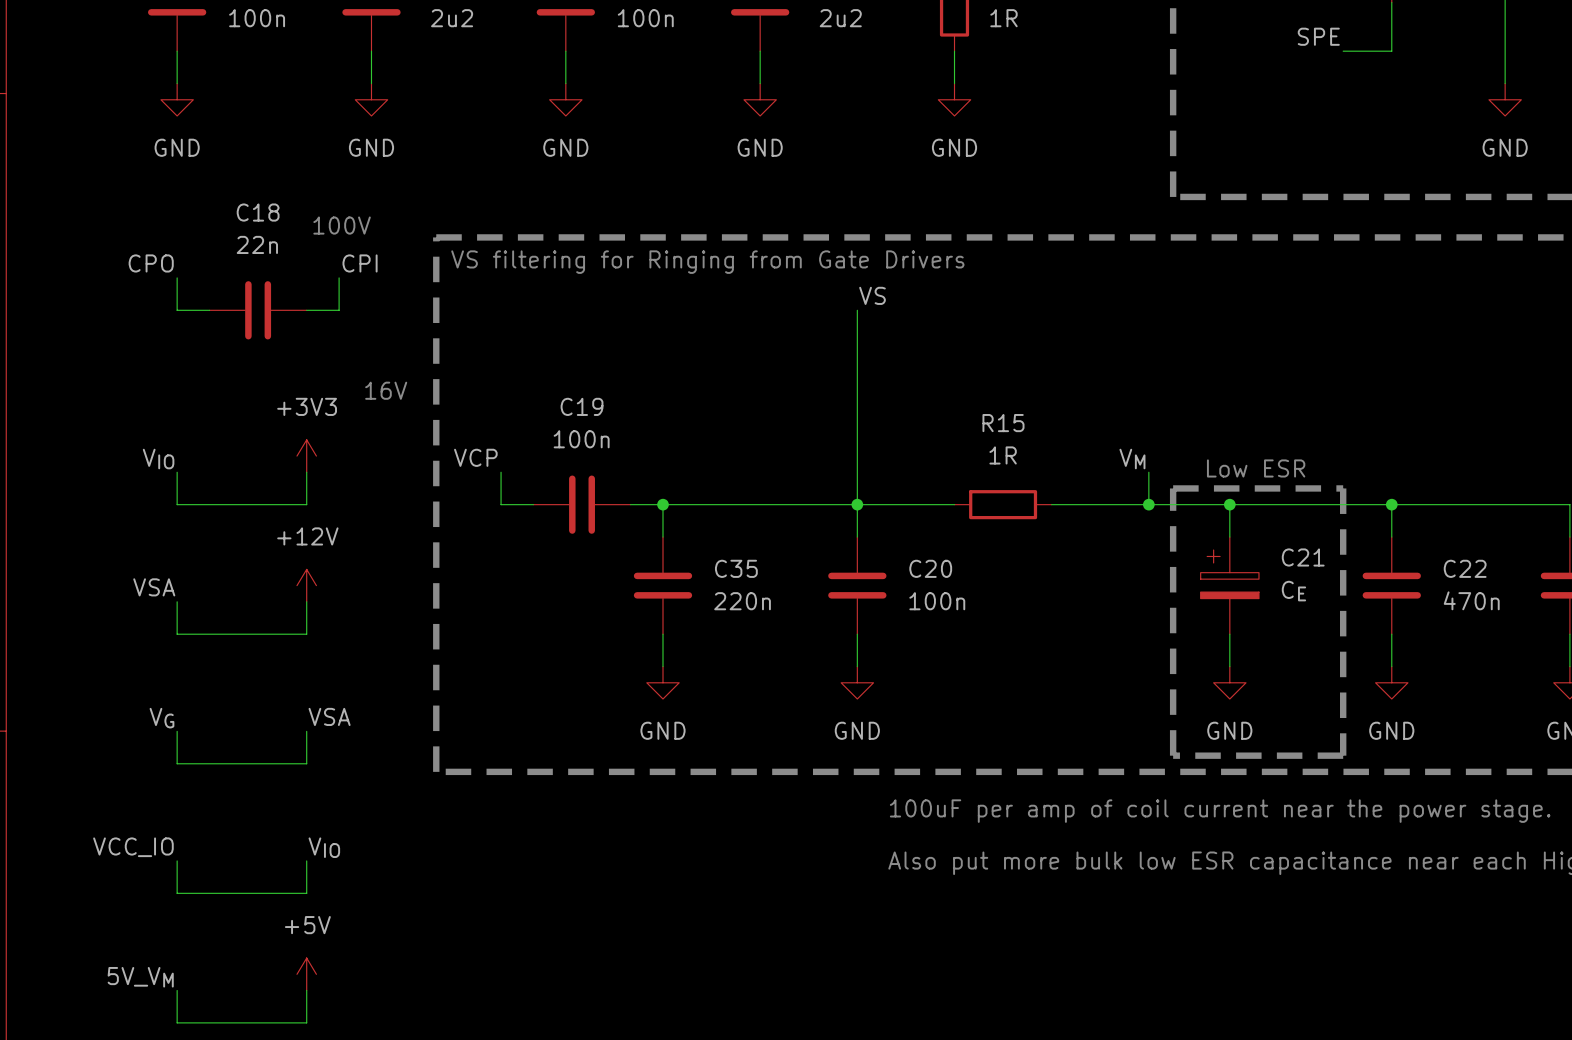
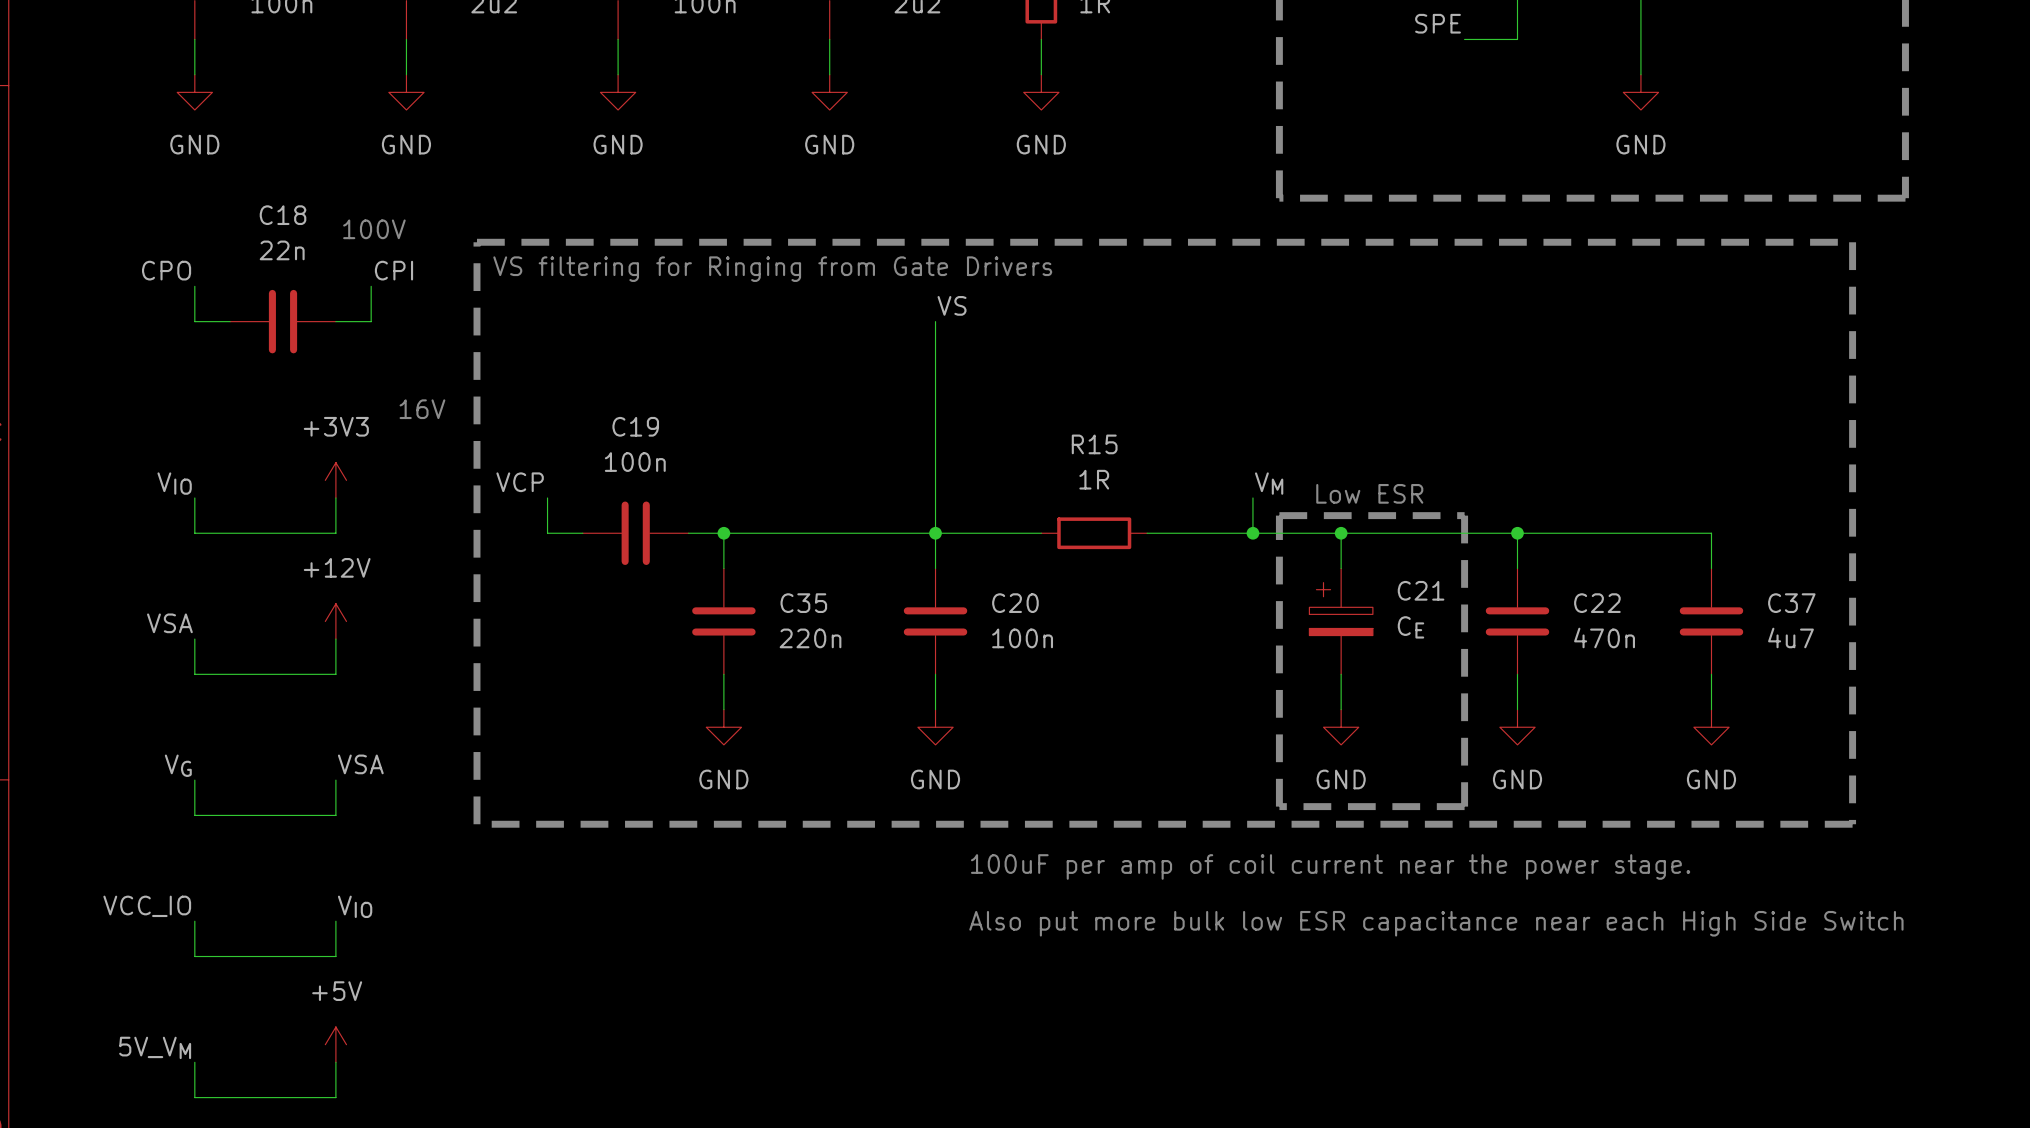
label position: VM (1132, 459) -> VM (1269, 483)

